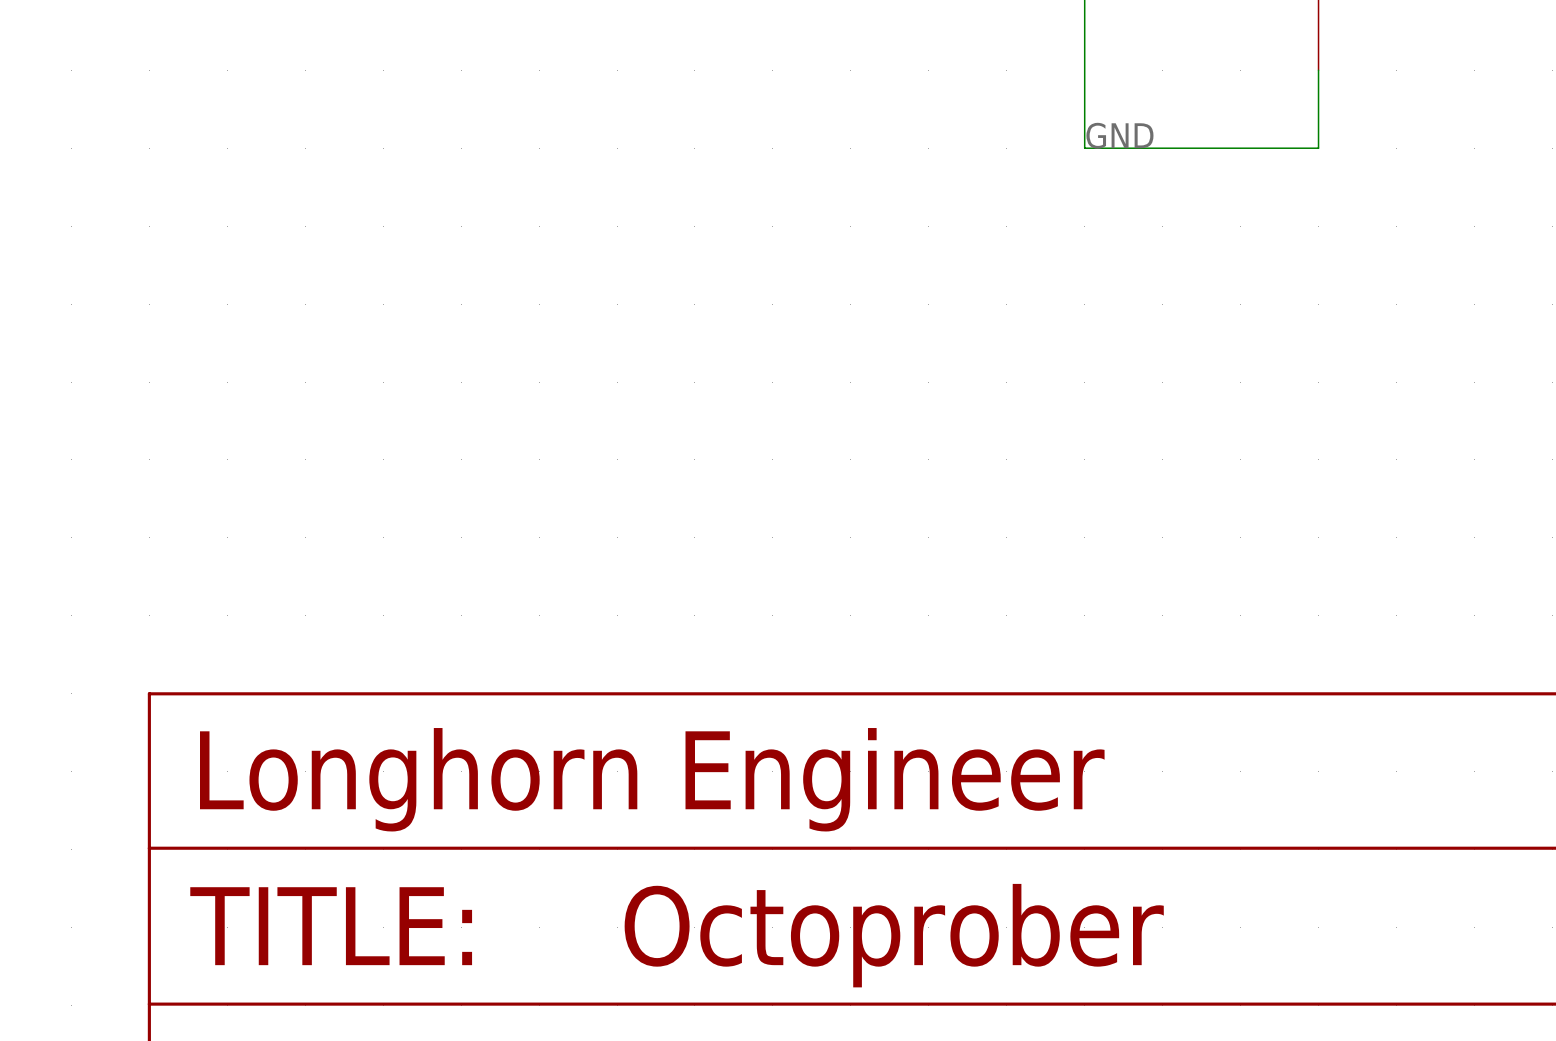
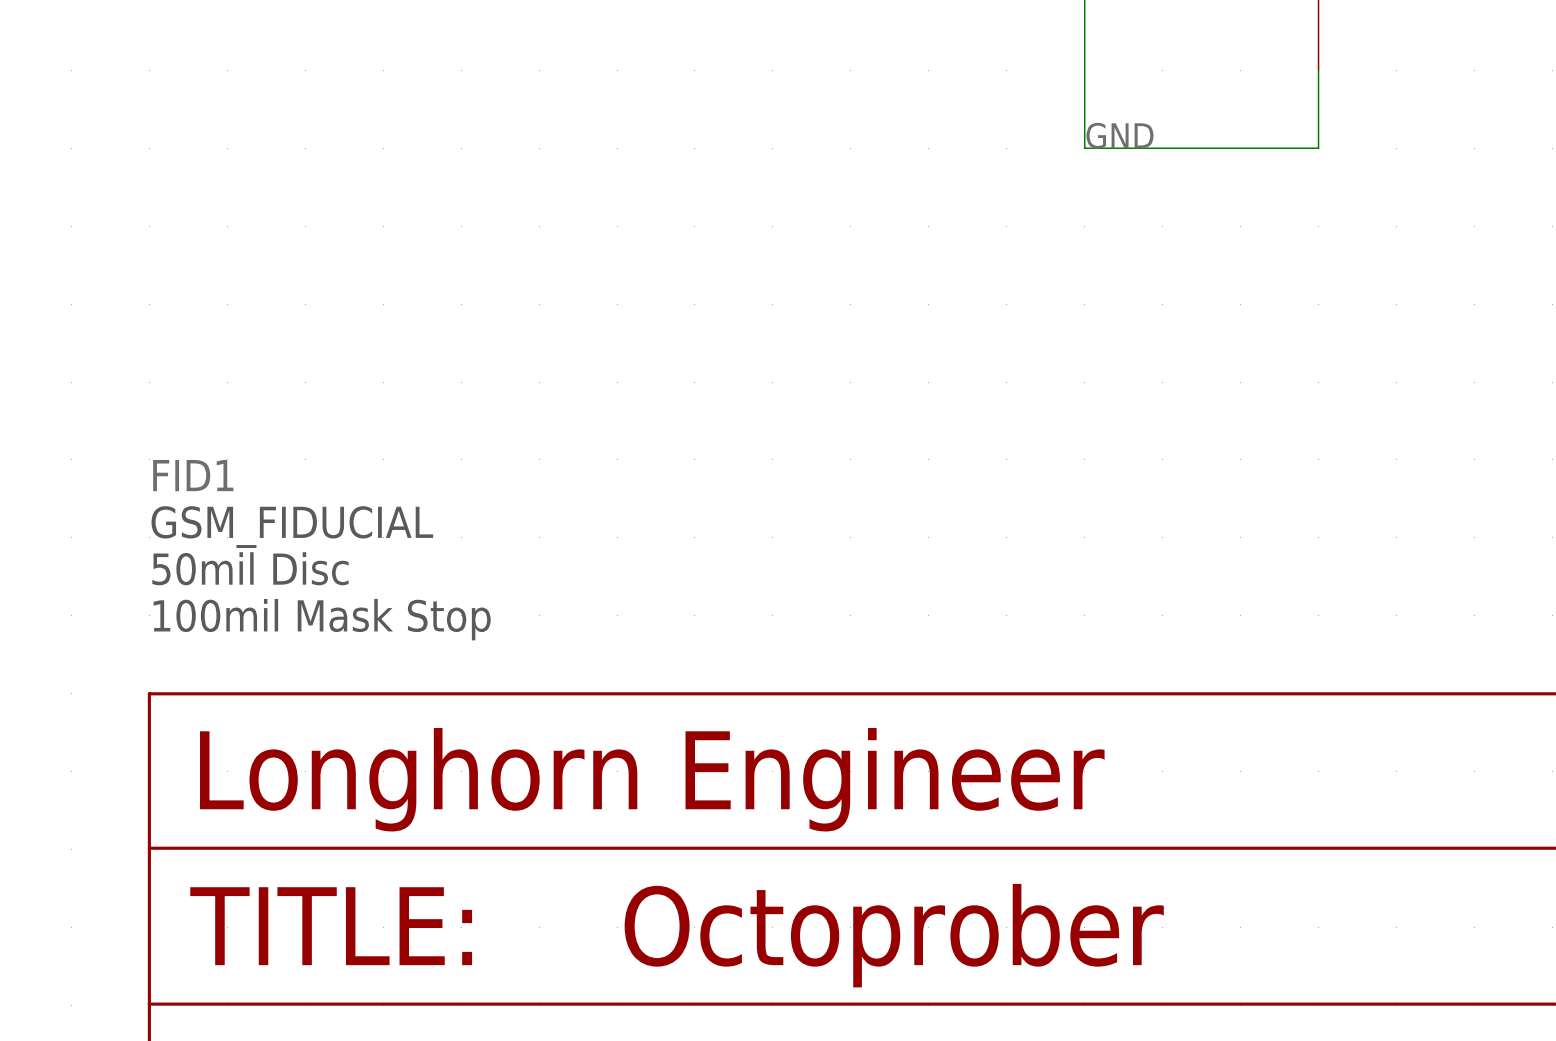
FID1: none -> (321, 550)

